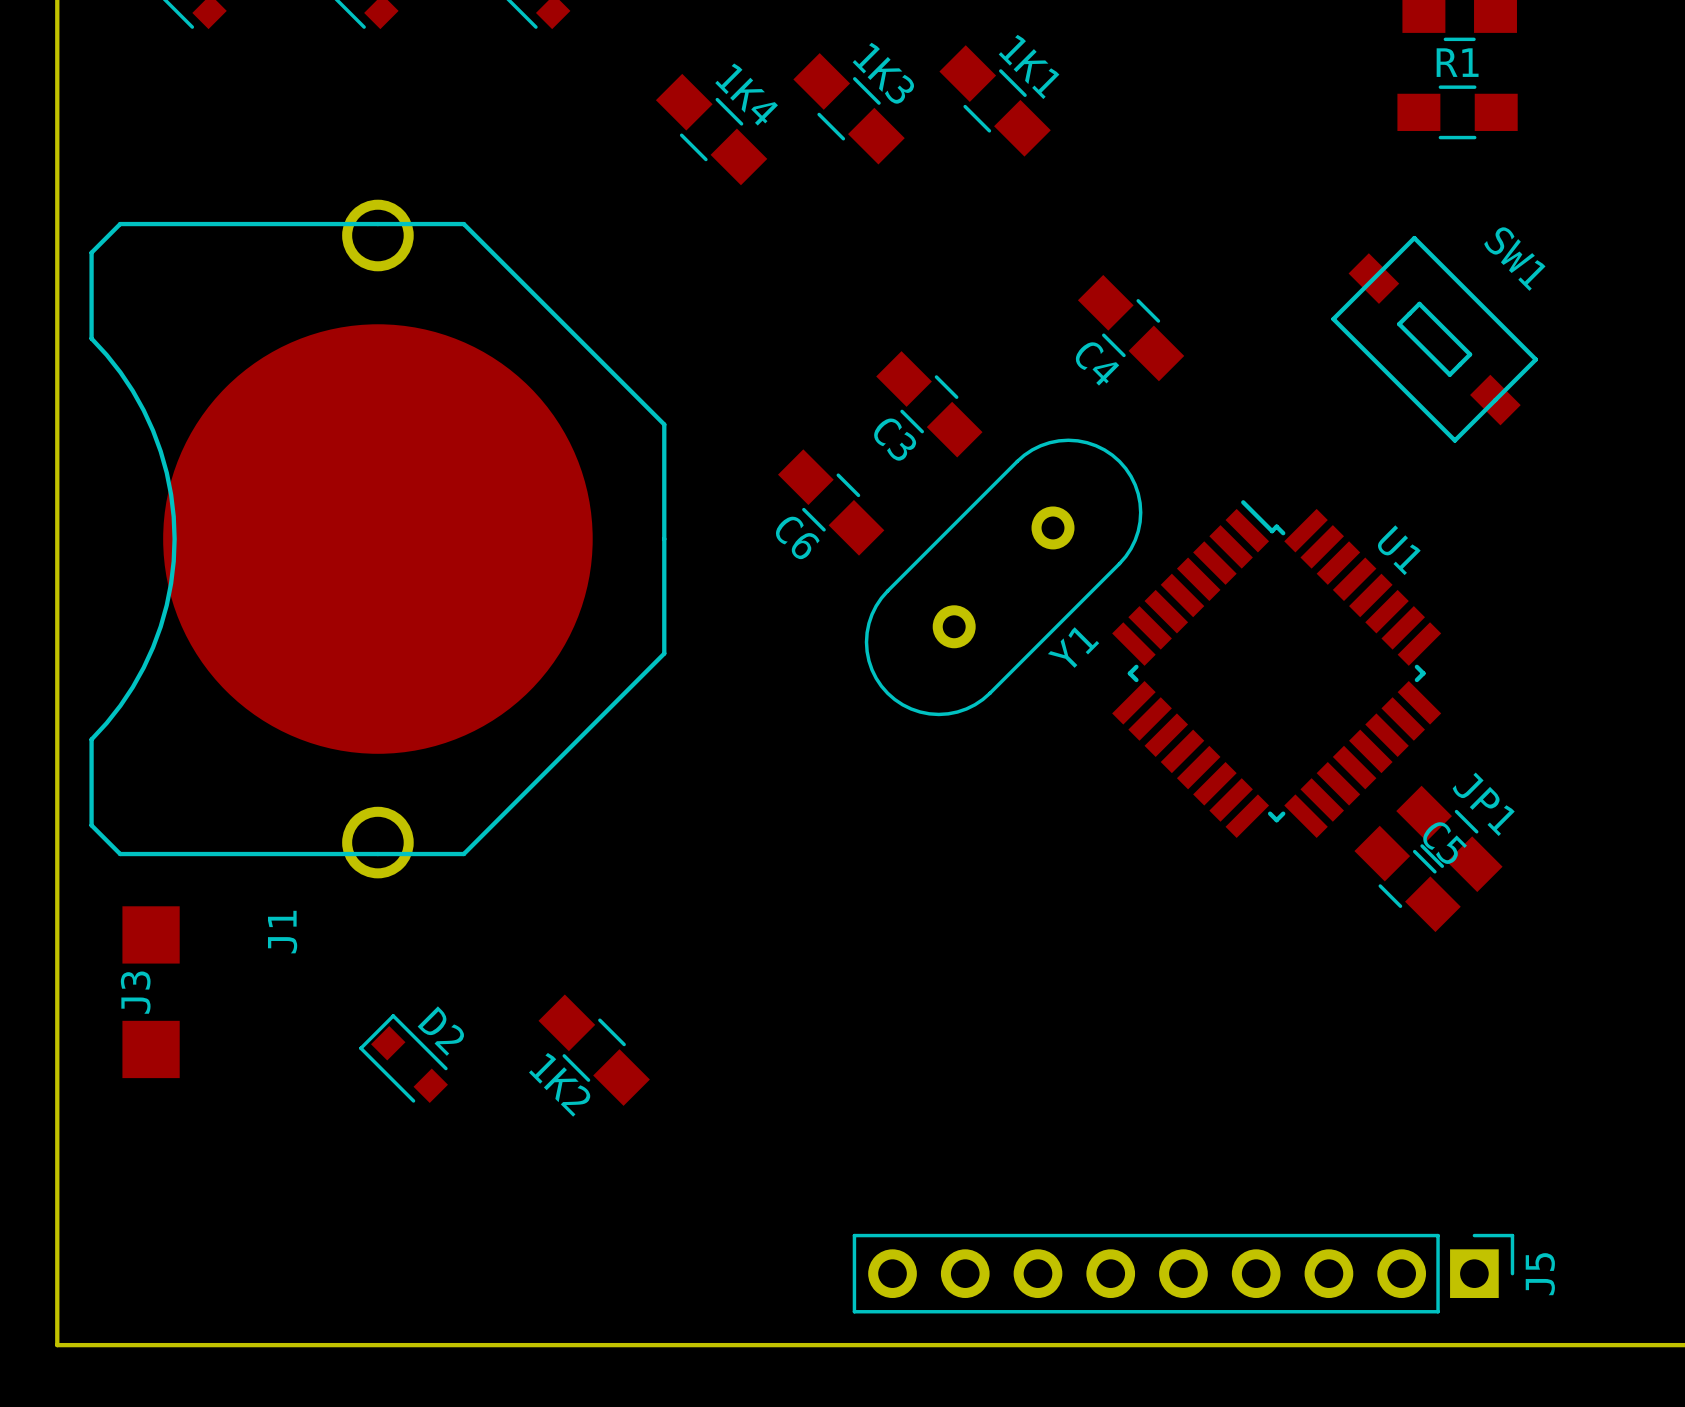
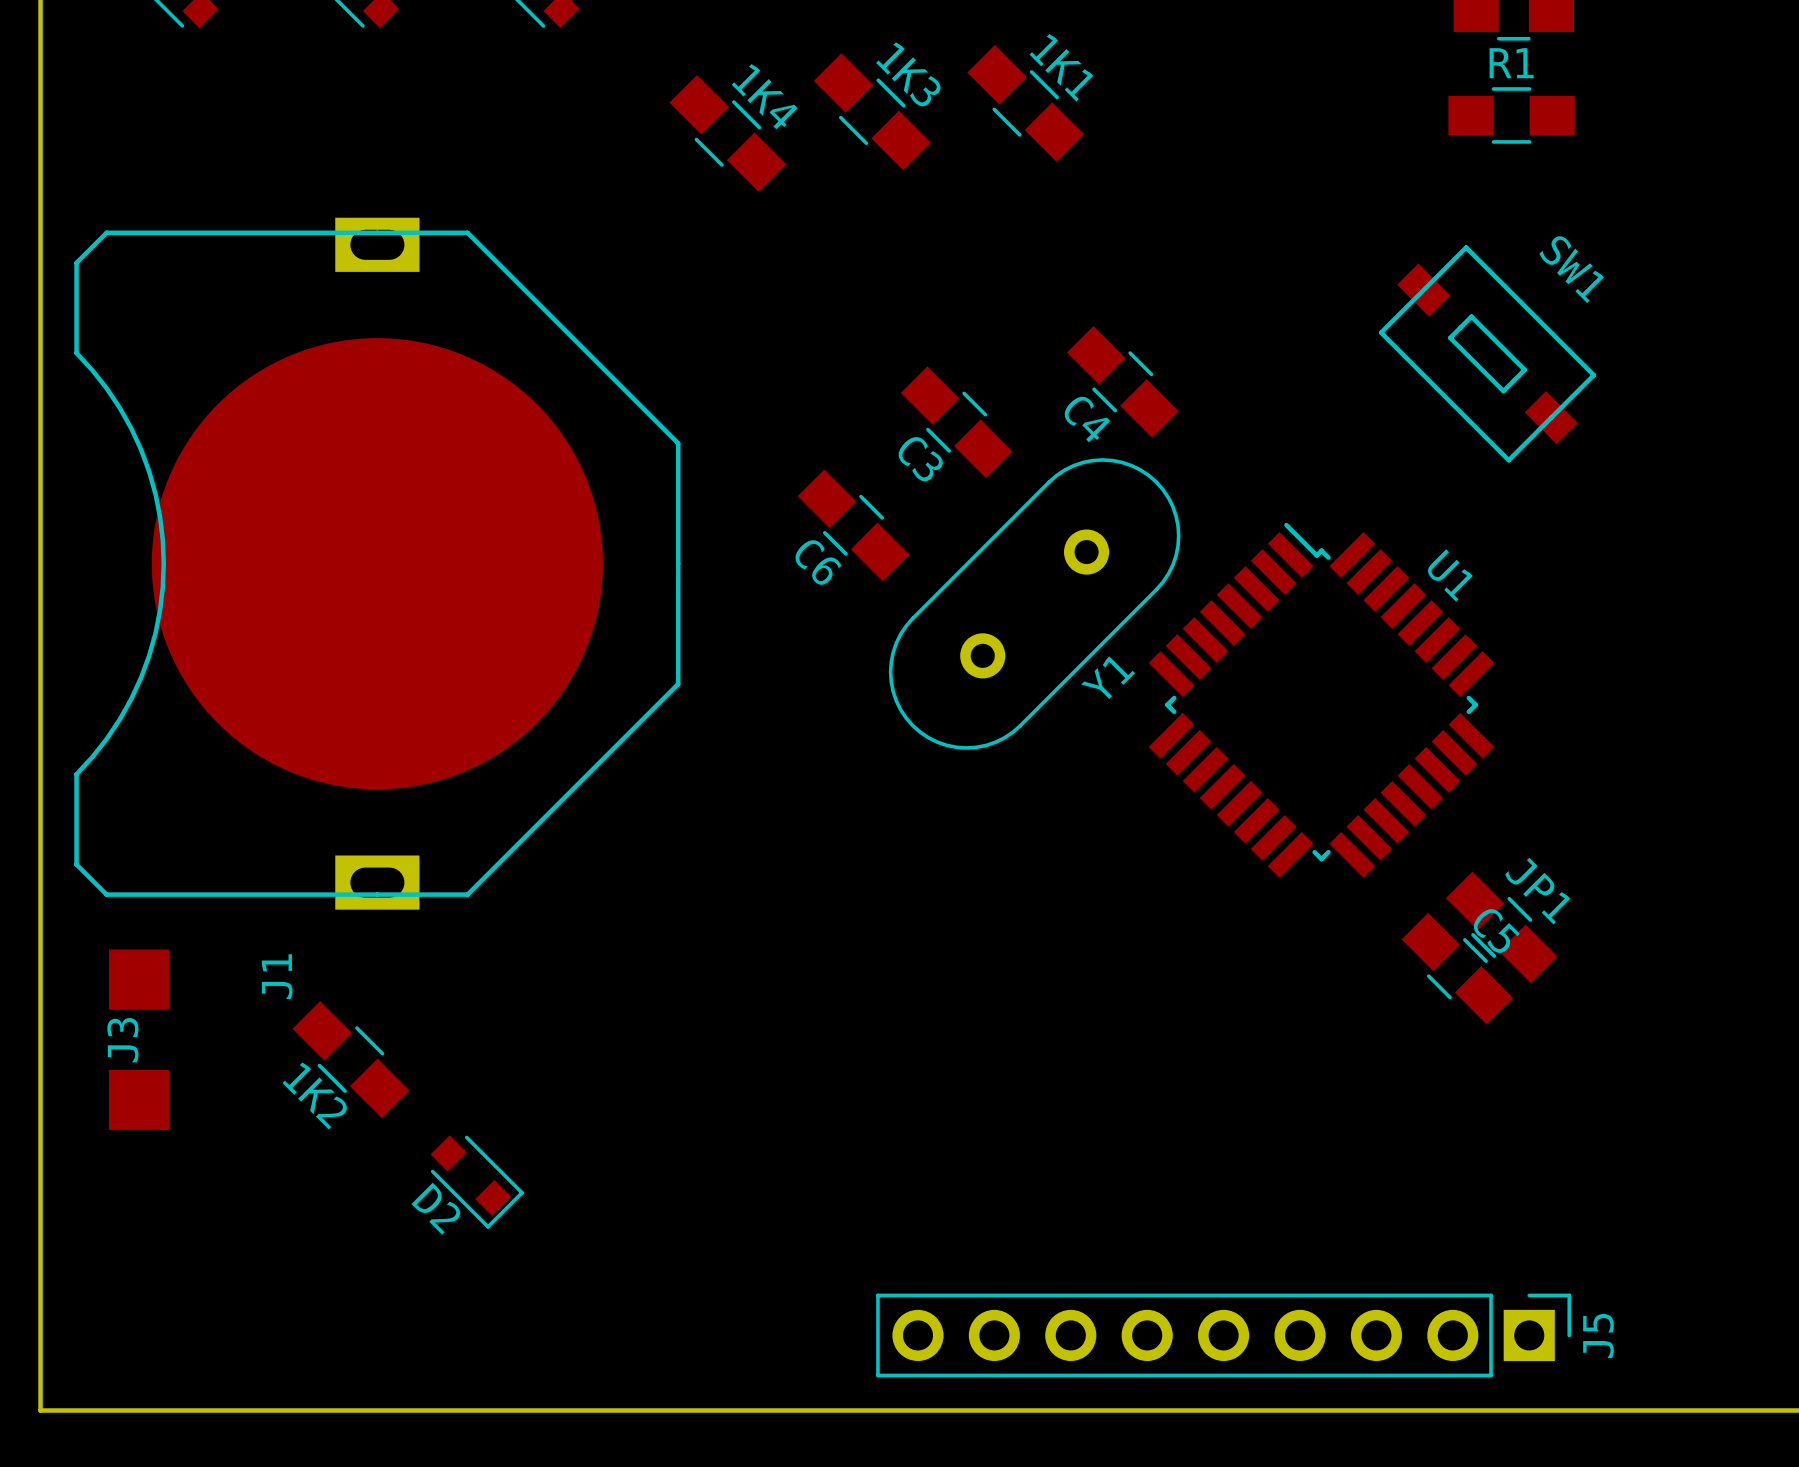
J1 footprint: [89, 199, 667, 879] -> [74, 217, 681, 910]
C4 position: (1131, 328) -> (1122, 381)
JP1 position: (1449, 838) -> (1501, 927)
C5 position: (1407, 878) -> (1457, 968)
1K2 position: (594, 1050) -> (351, 1059)
D2 rotation: 0° (403, 1058) -> 180° (477, 1181)
D2 position: (403, 1058) -> (477, 1181)

